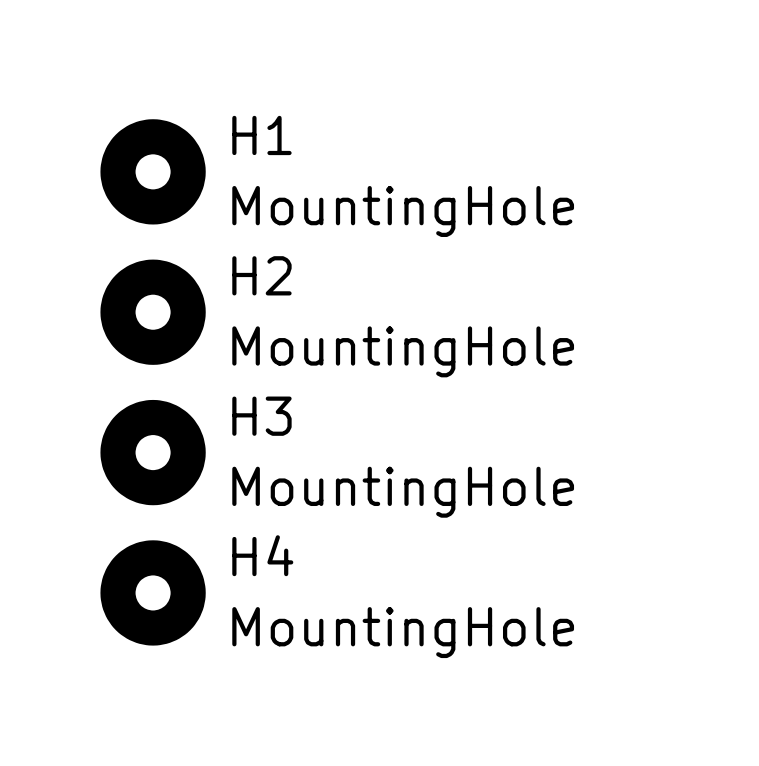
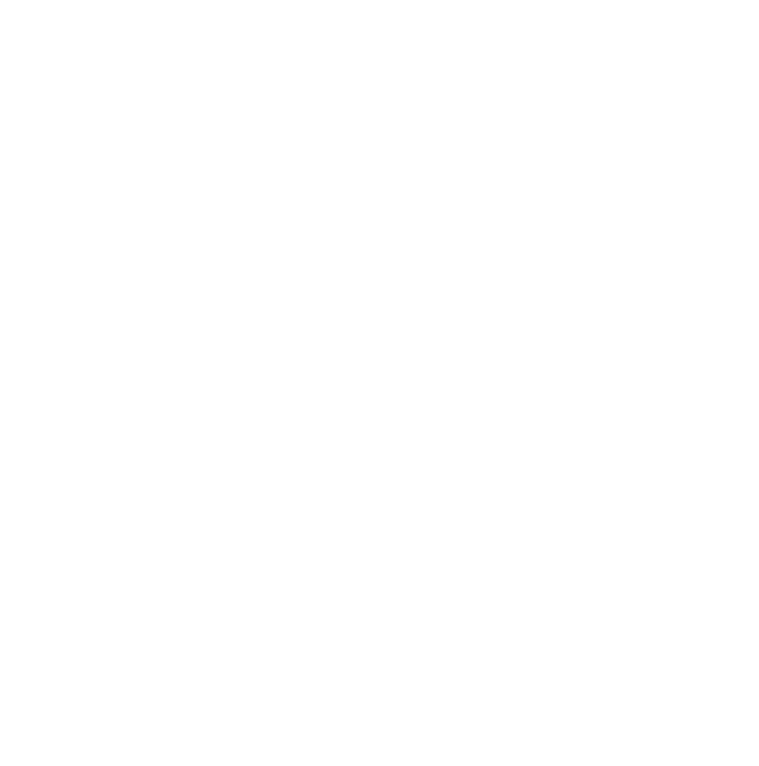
H1: MountingHole (153, 171) -> none
H2: MountingHole (153, 312) -> none
H3: MountingHole (153, 452) -> none
H4: MountingHole (153, 592) -> none

